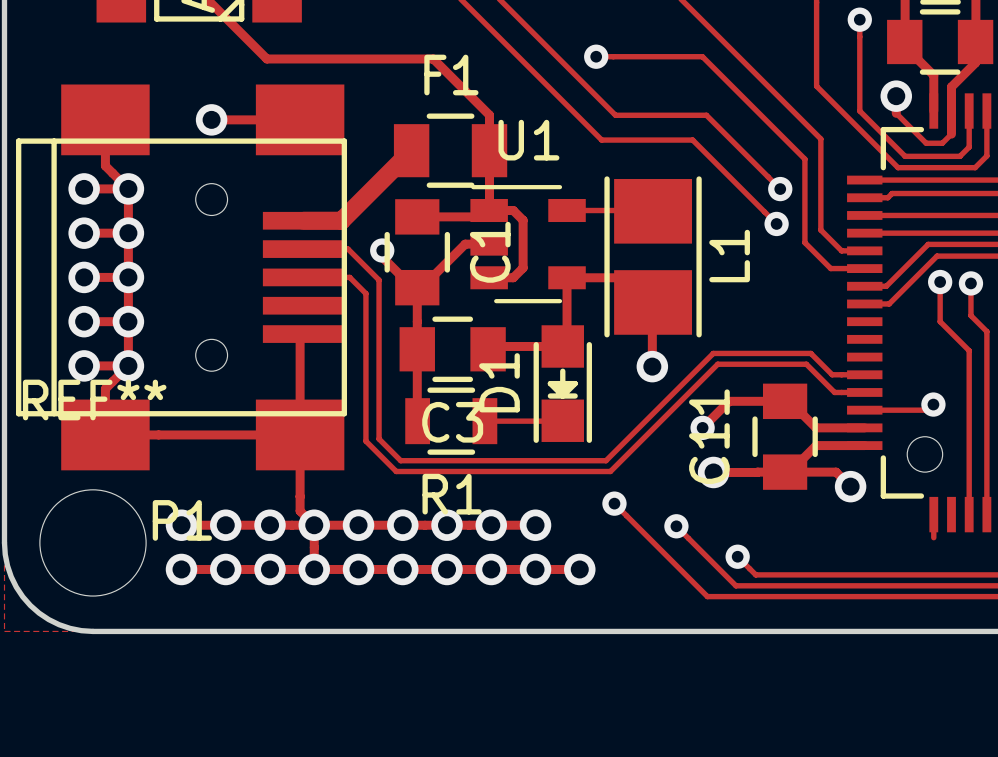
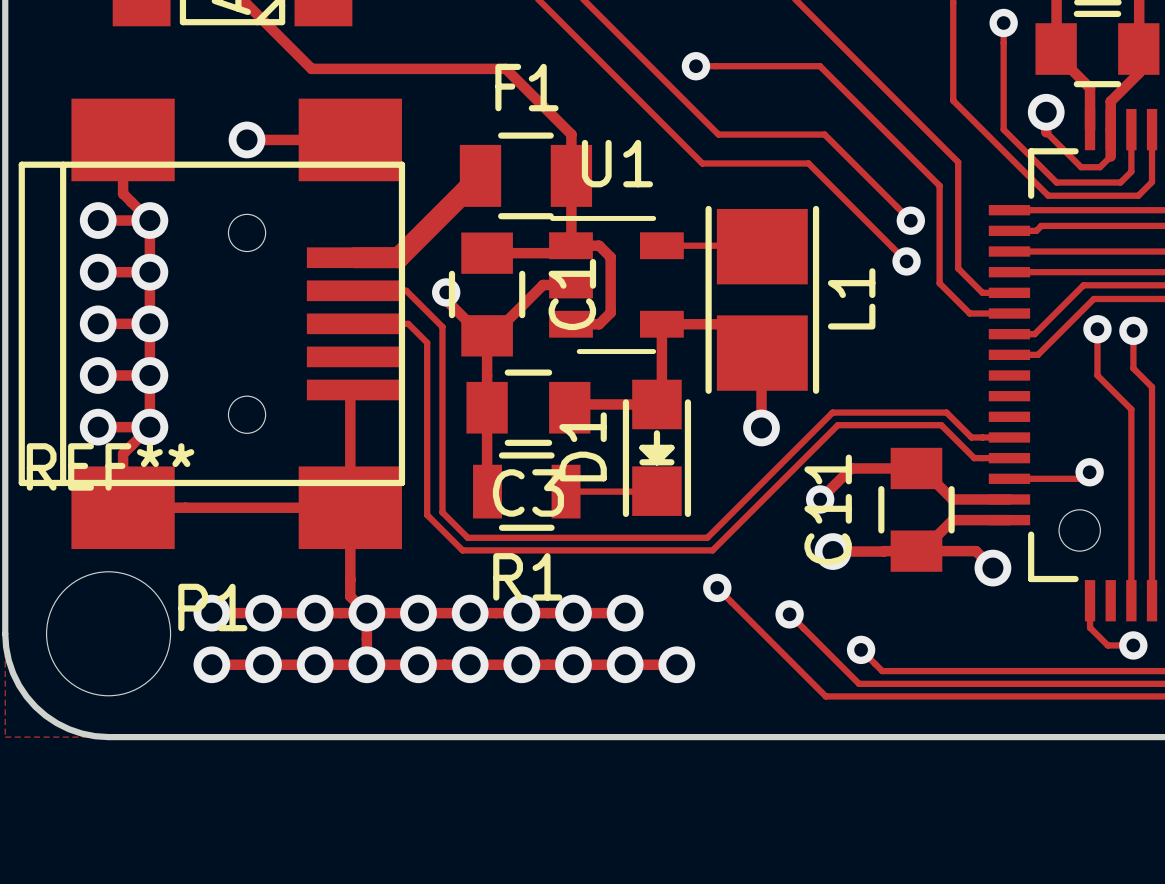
track: none -> (1090, 627) (1107, 645) (1133, 645)
via: none -> (1133, 645)

